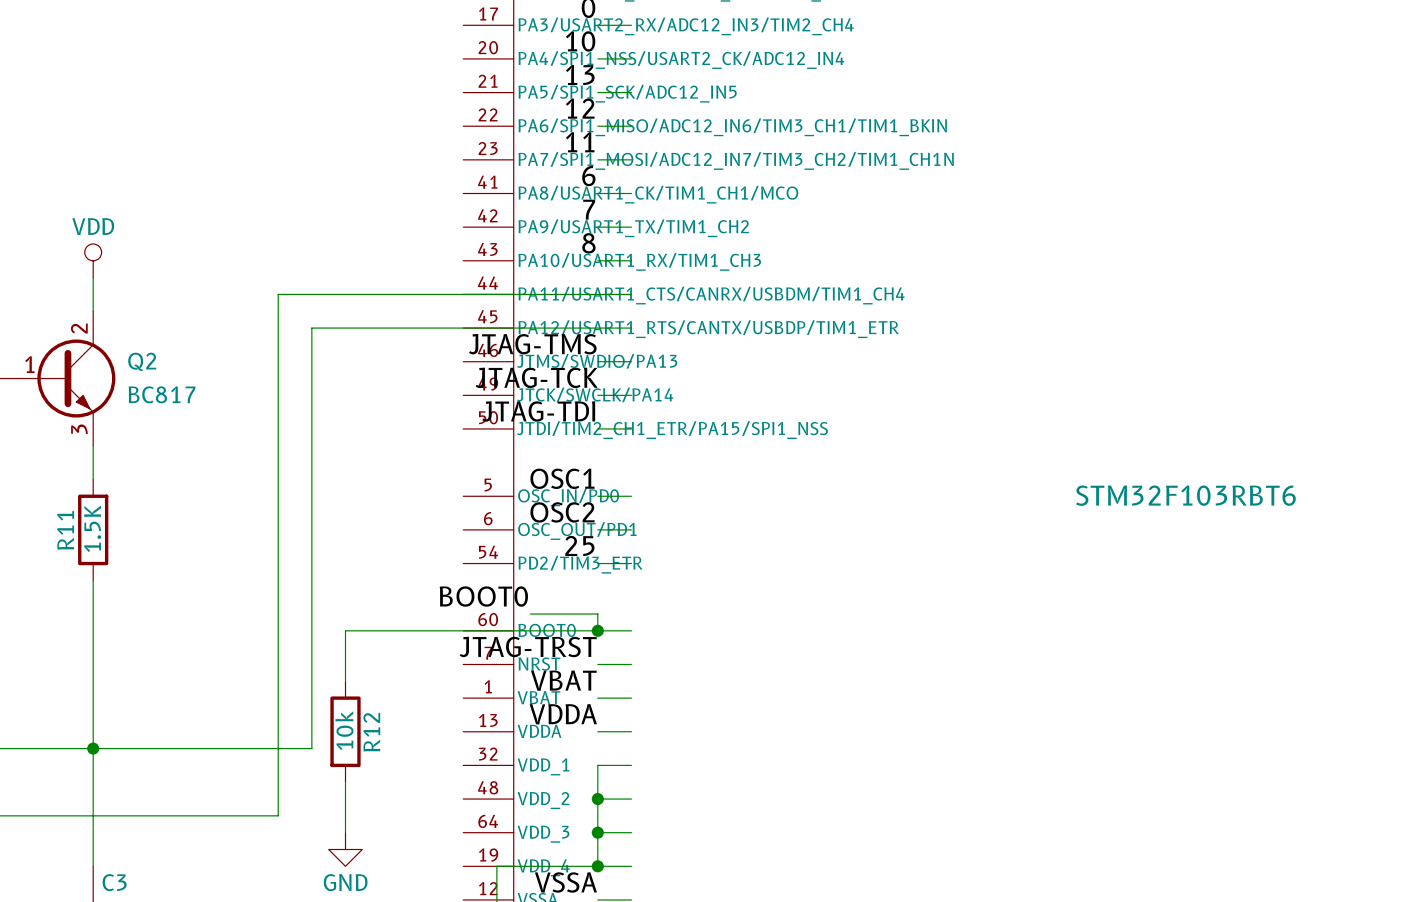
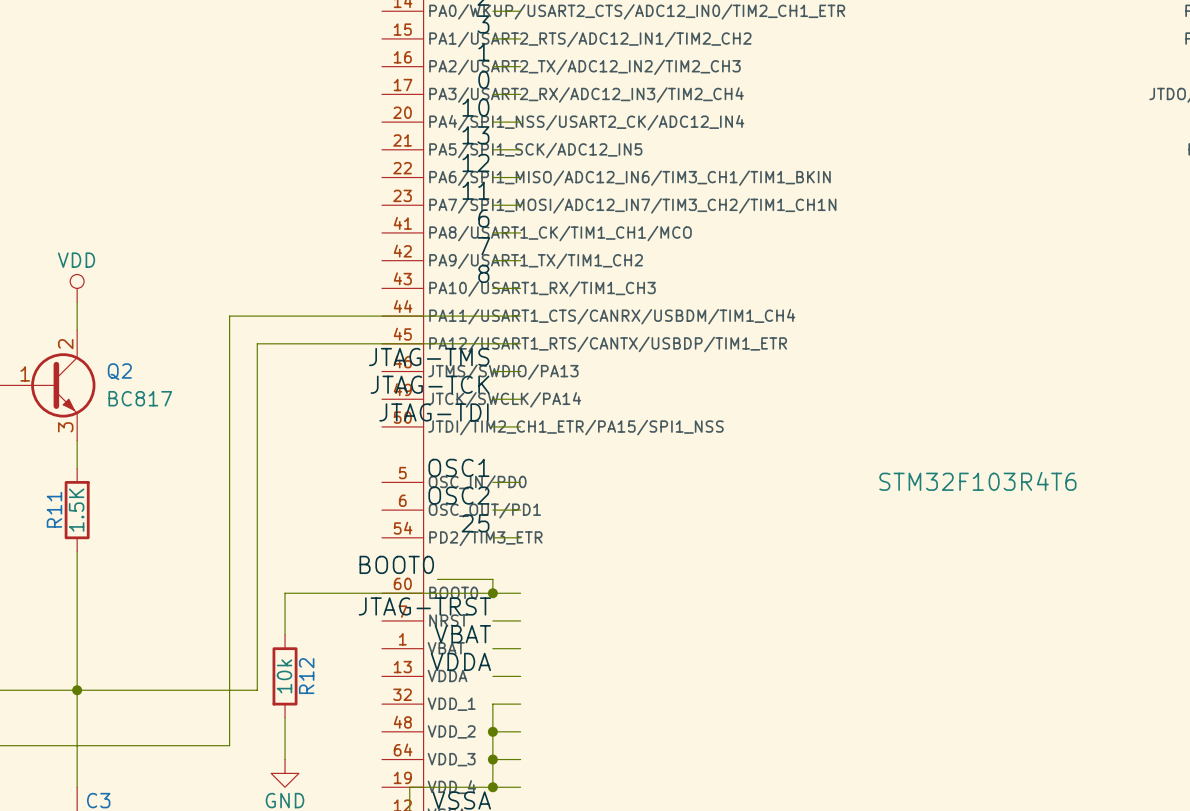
part value: STM32F103RBT6 (1185, 495) -> STM32F103R4T6 (977, 481)

